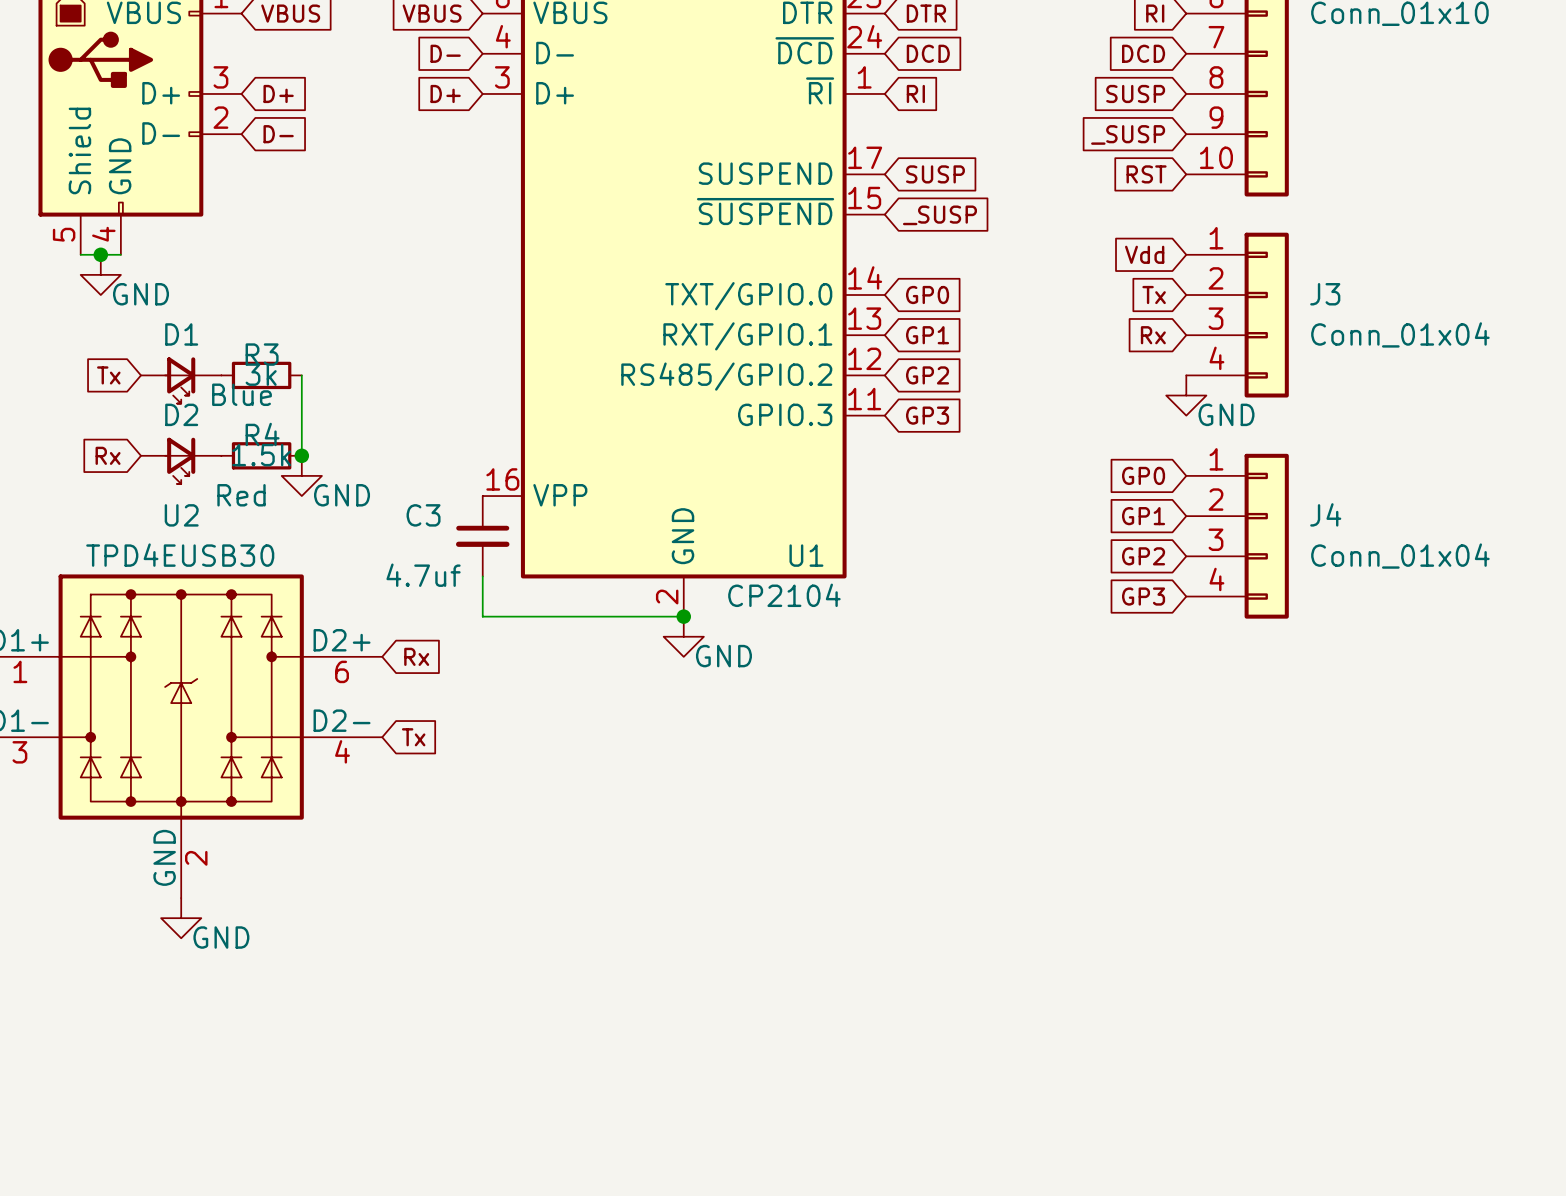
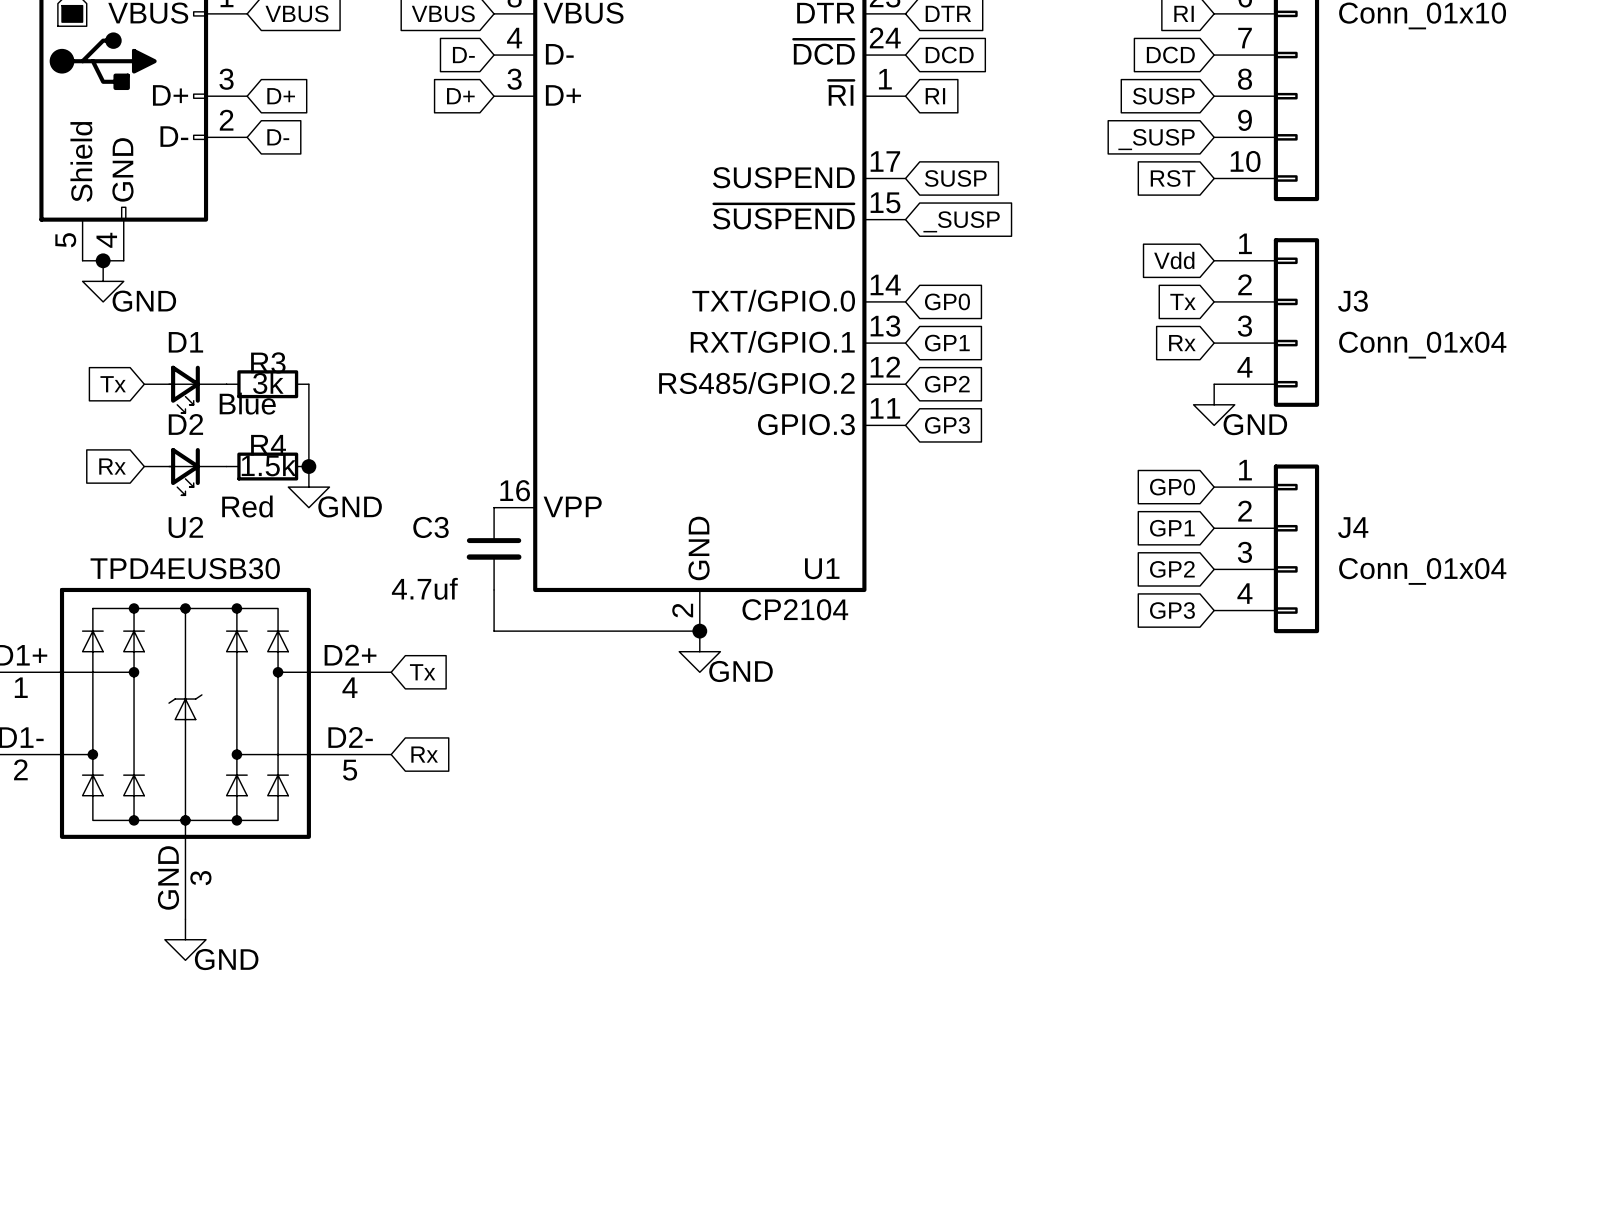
global label: Rx (416, 656) -> Tx (422, 672)
U2 pin number: 6 (342, 671) -> 4 (349, 687)
global label: Tx (413, 737) -> Rx (424, 754)
U2 pin number: 4 (342, 751) -> 5 (350, 770)
U2 pin number: 3 (19, 752) -> 2 (20, 769)
U2 pin number: 2 (196, 858) -> 3 (200, 878)

